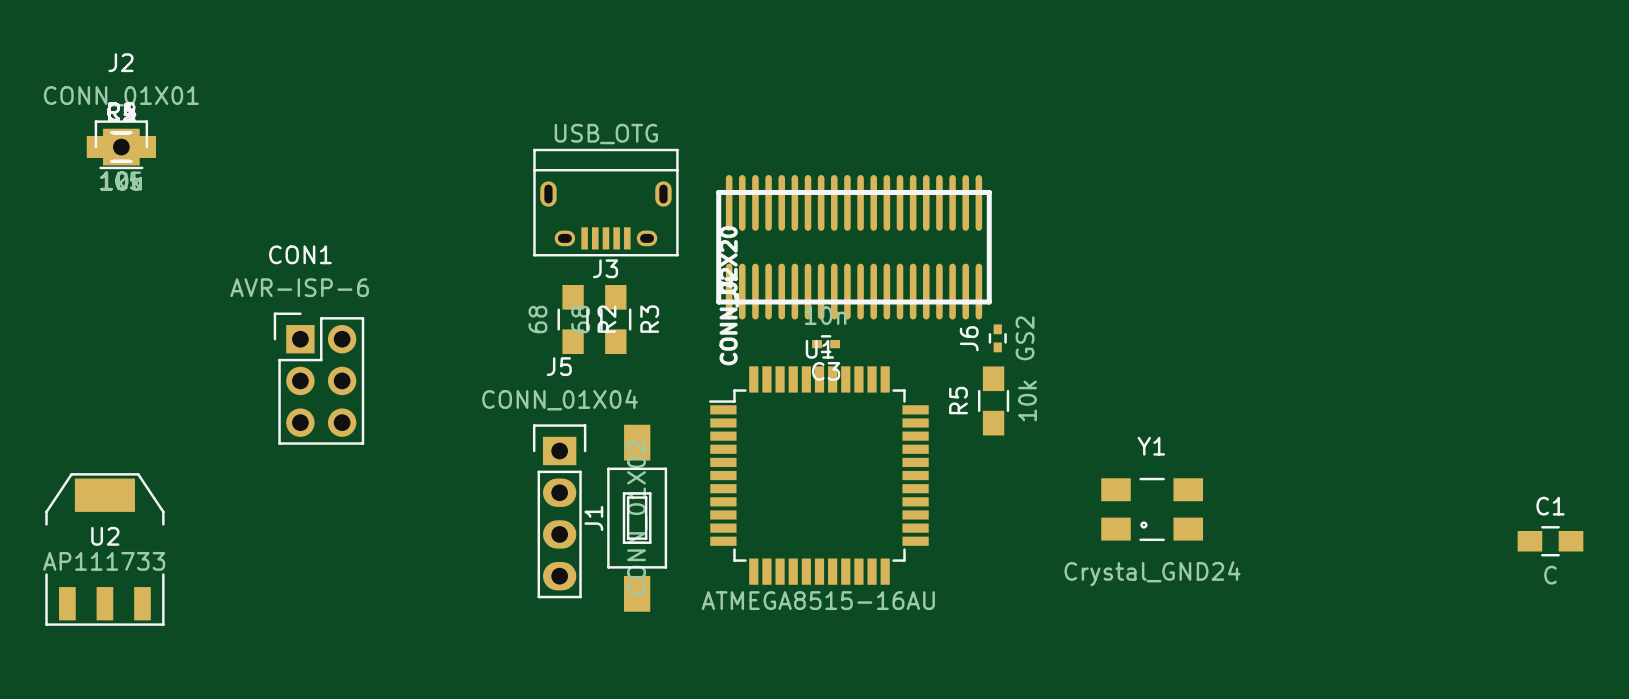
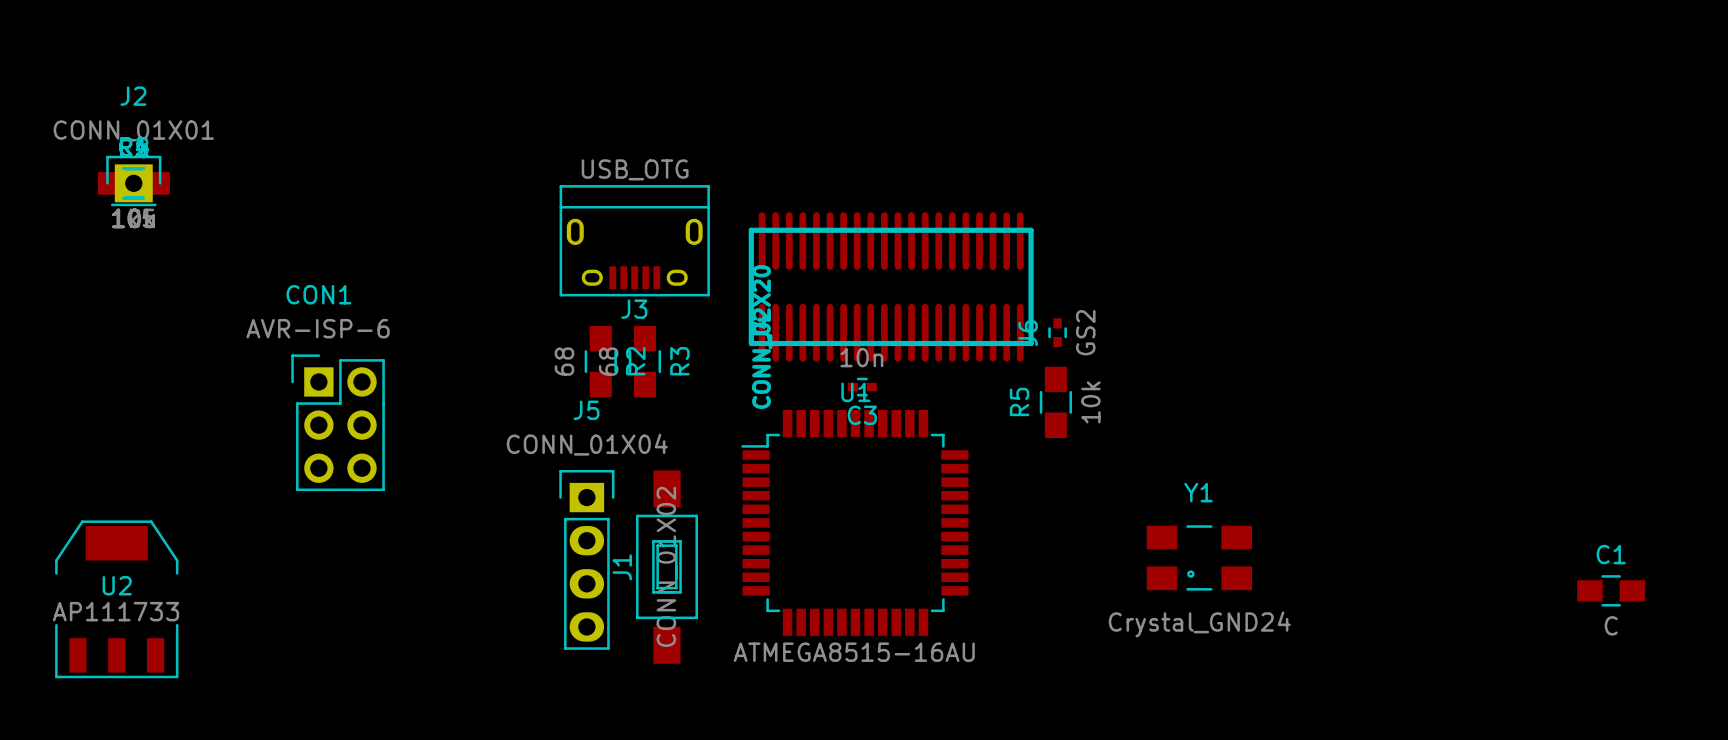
J6 position: (997, 338) -> (1057, 332)
R5 position: (993, 400) -> (1055, 402)

